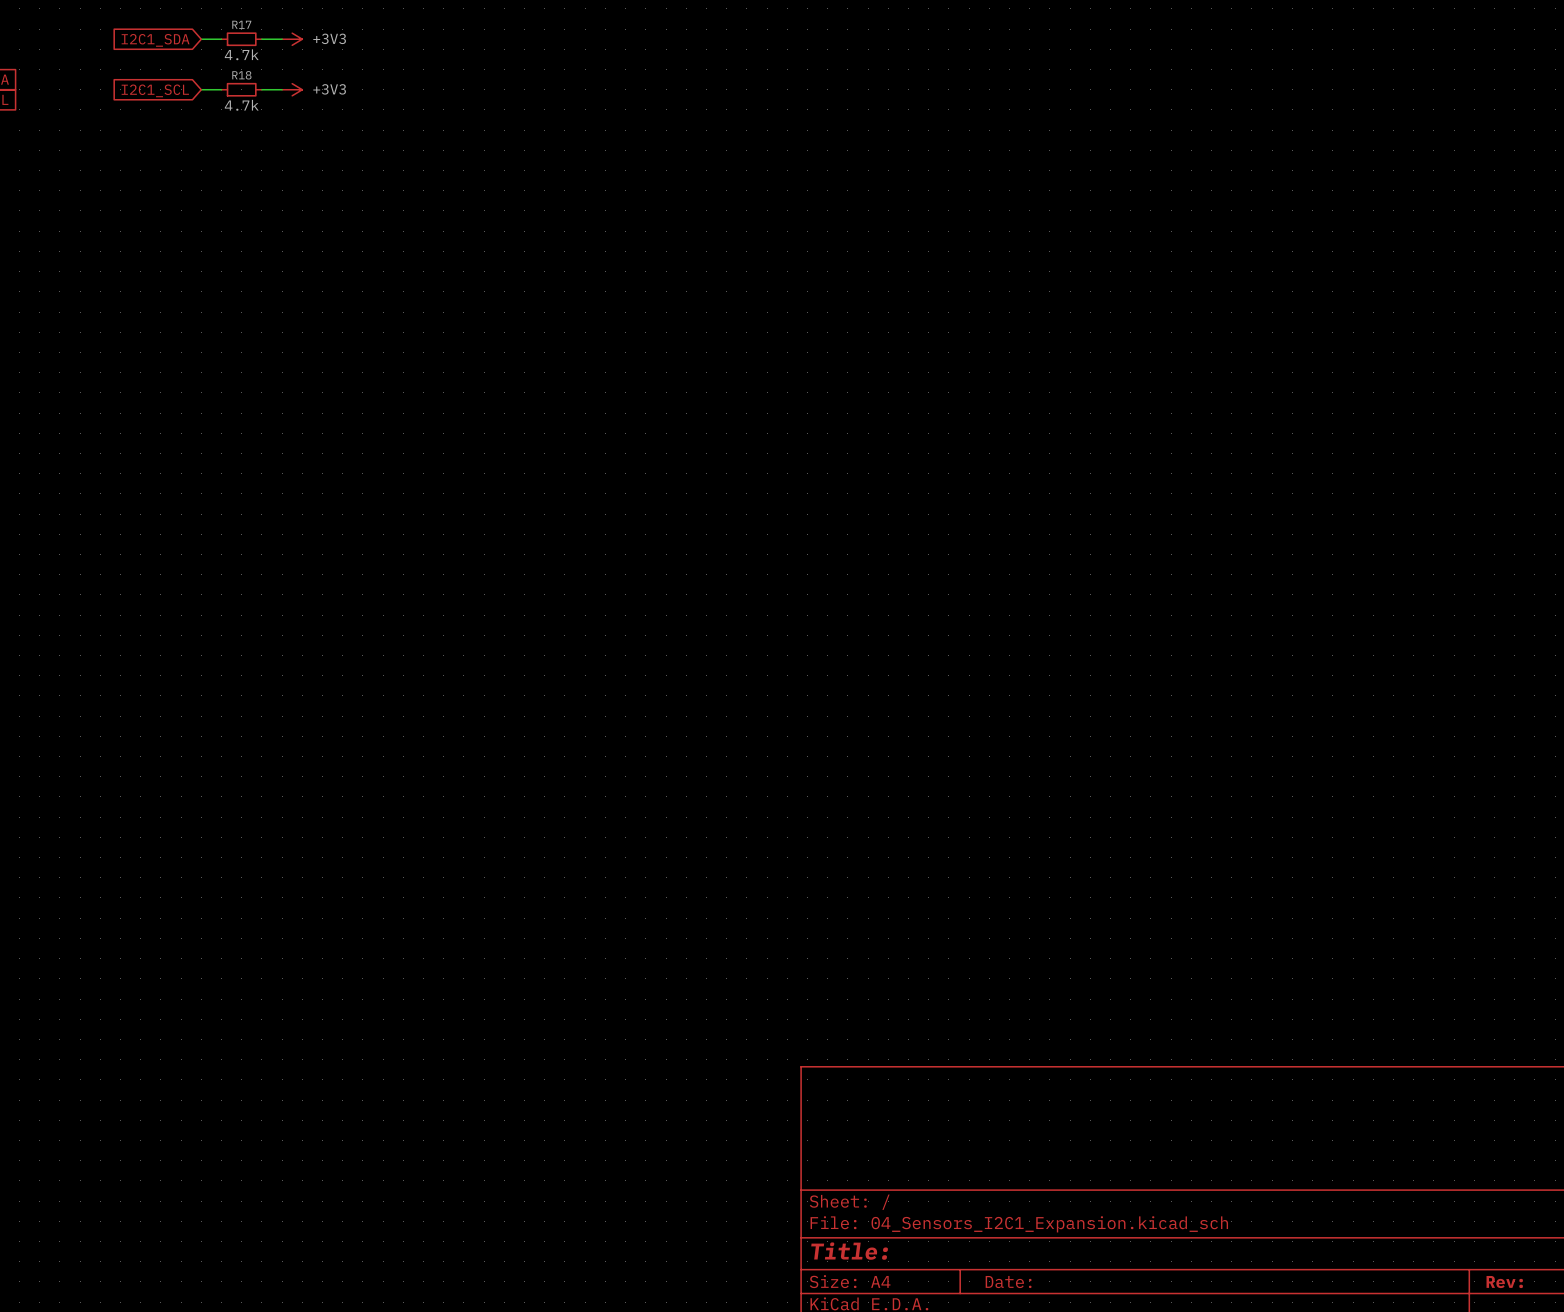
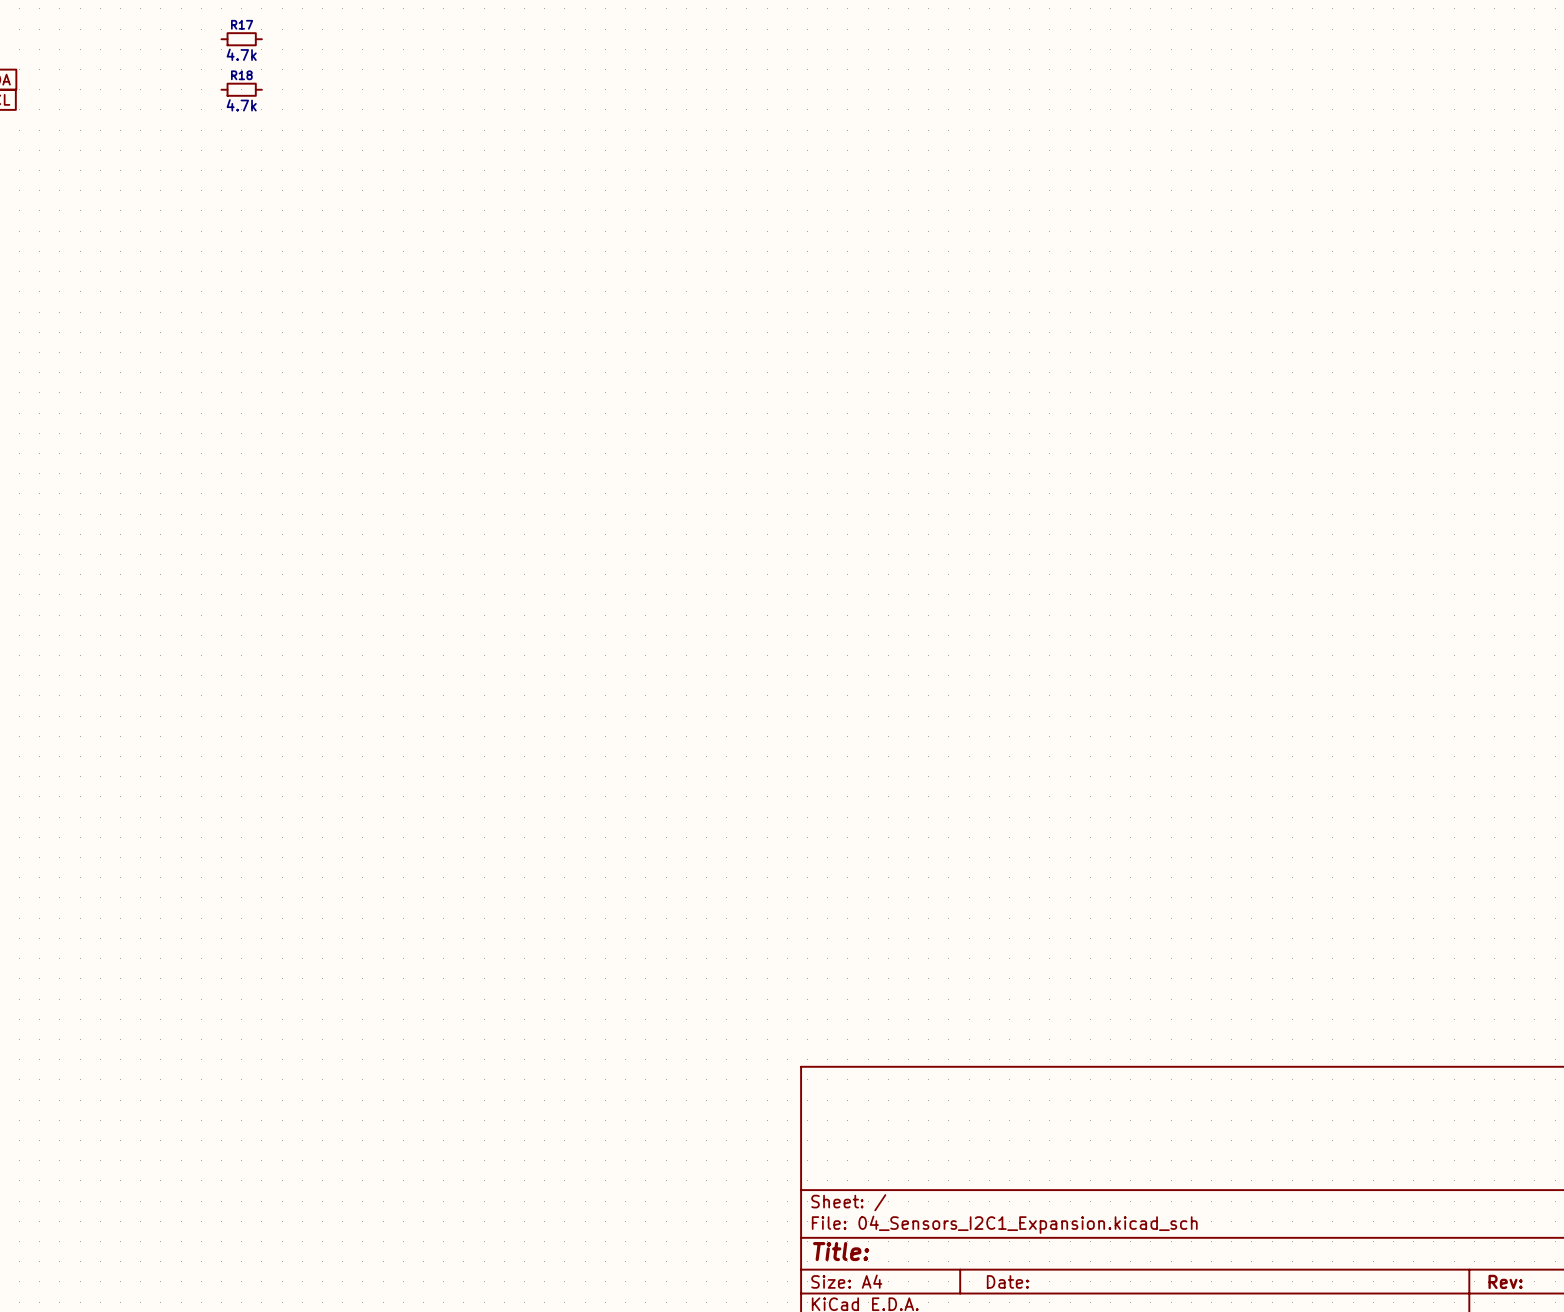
wire: (201, 39) (221, 39) -> none
wire: (261, 39) (282, 39) -> none
power symbol: +3V3 (292, 39) -> none
global label: I2C1_SDA (155, 40) -> none
wire: (201, 89) (221, 89) -> none
wire: (261, 89) (282, 89) -> none
power symbol: +3V3 (292, 89) -> none
global label: I2C1_SCL (155, 90) -> none

